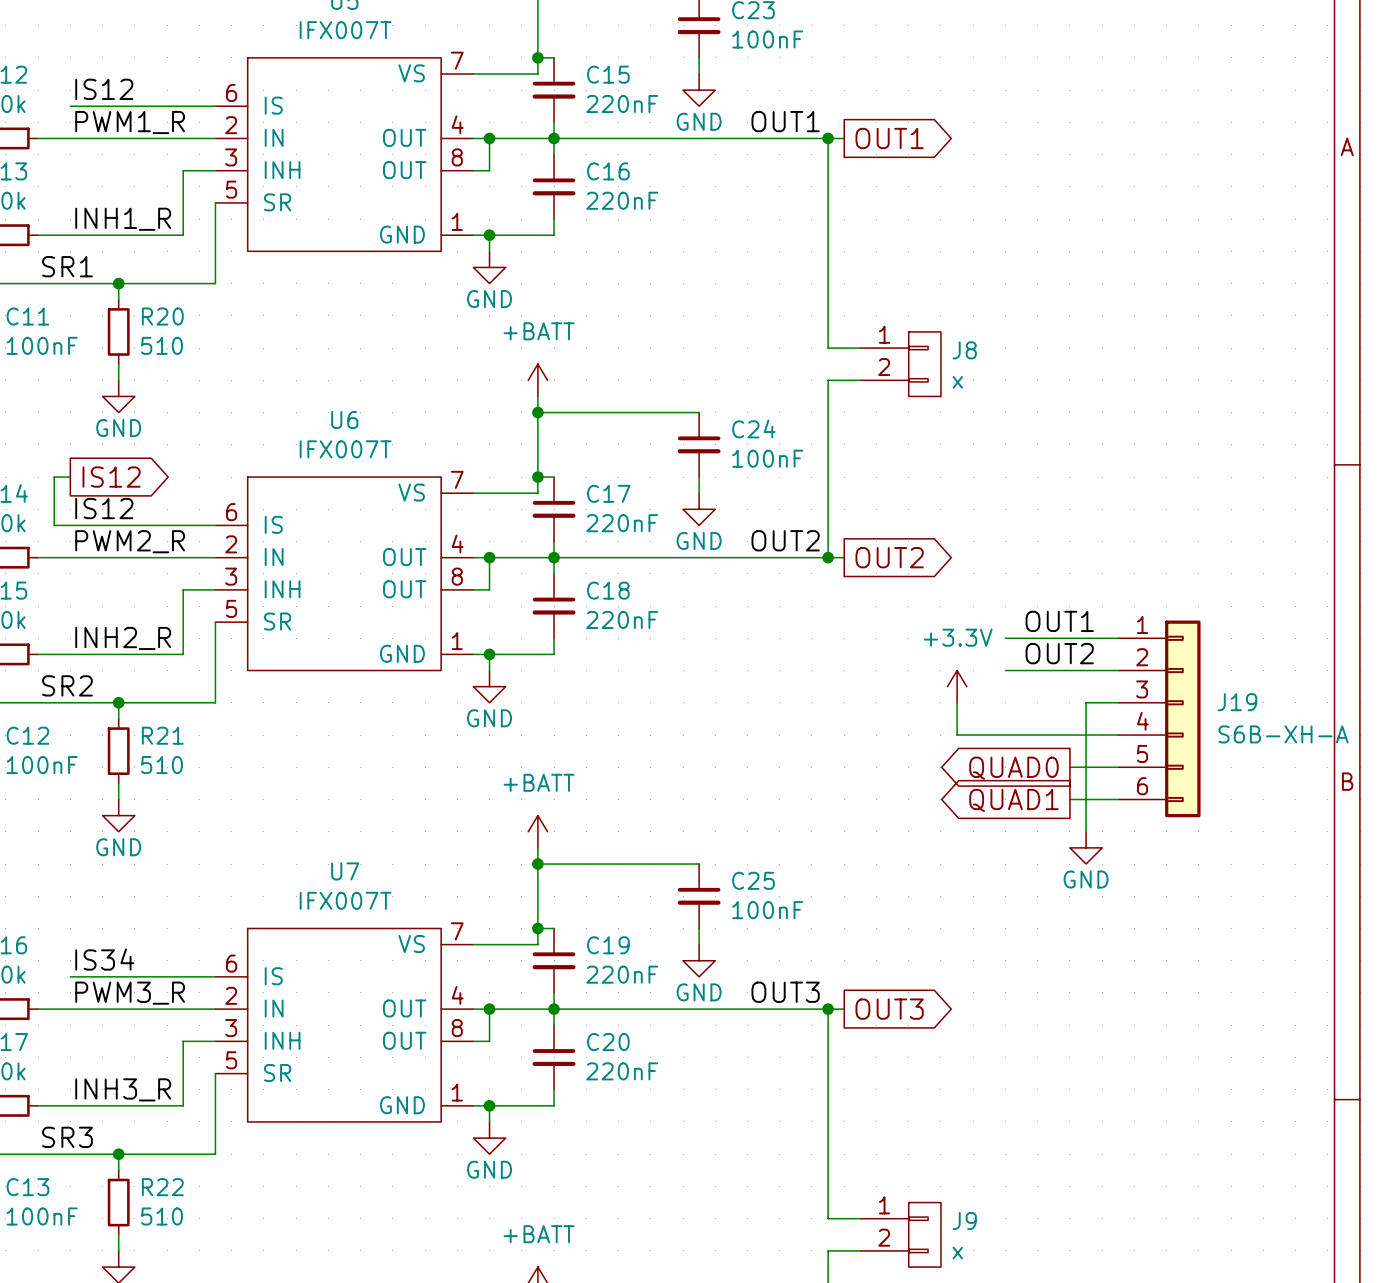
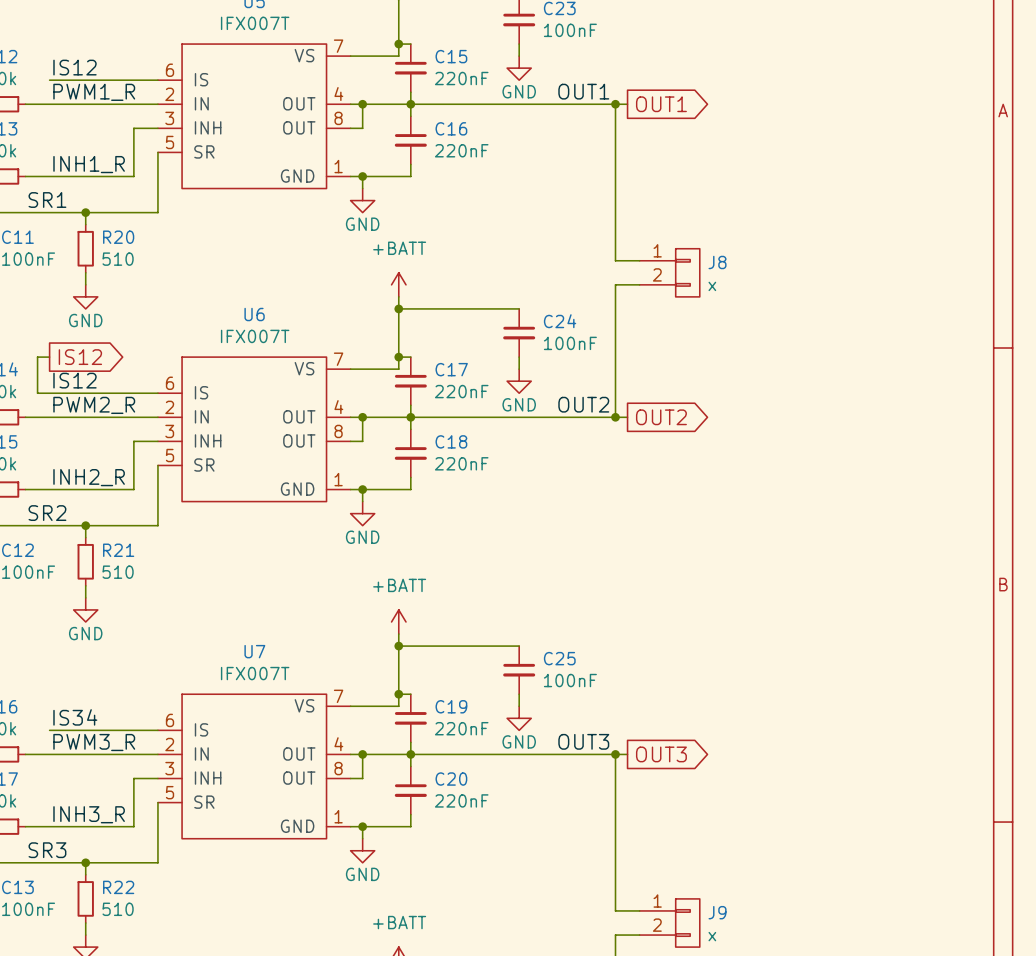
label: OUT1 (1059, 621) -> none
wire: (1005, 638) (1118, 638) -> none
label: OUT2 (1059, 653) -> none
wire: (1005, 670) (1118, 670) -> none
power symbol: +3.3V (957, 686) -> none
wire: (957, 702) (957, 735) (1118, 735) -> none
wire: (1118, 702) (1086, 702) (1086, 831) -> none
J19: S6B-XH-A (1159, 718) -> none
wire: (1069, 767) (1118, 767) -> none
global label: QUAD0 (1013, 768) -> none
wire: (1069, 799) (1118, 799) -> none
global label: QUAD1 (1013, 800) -> none
power symbol: GND (1086, 847) -> none

